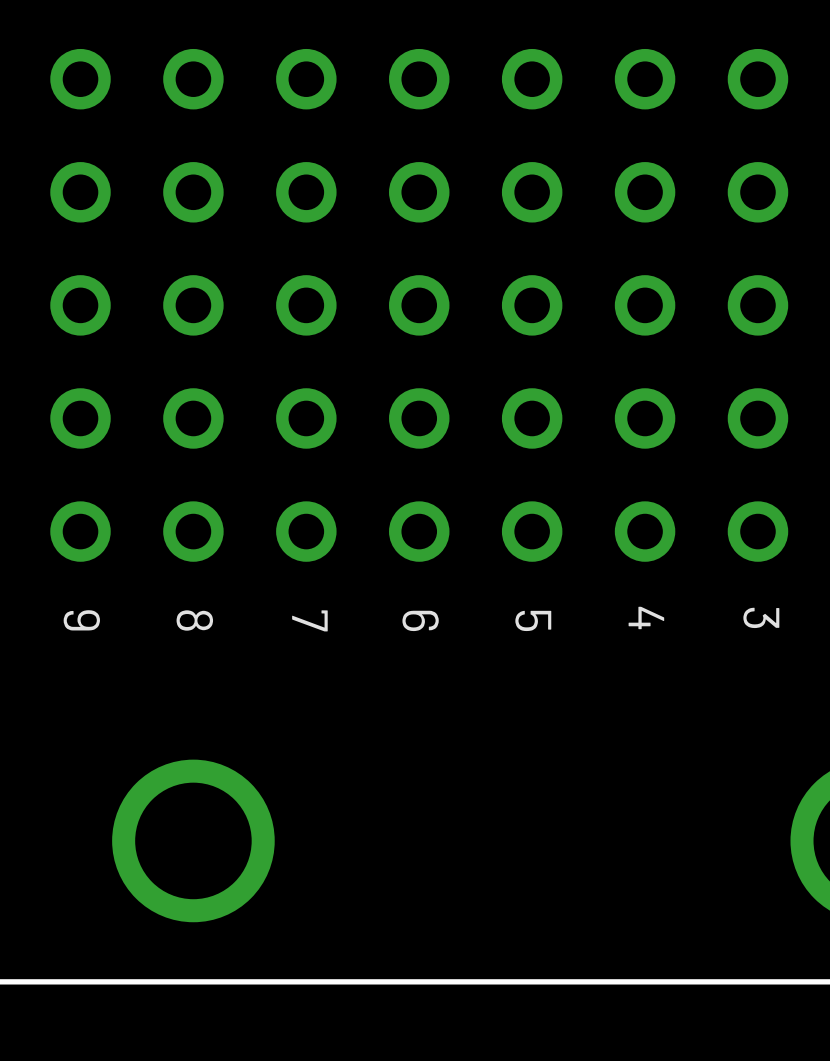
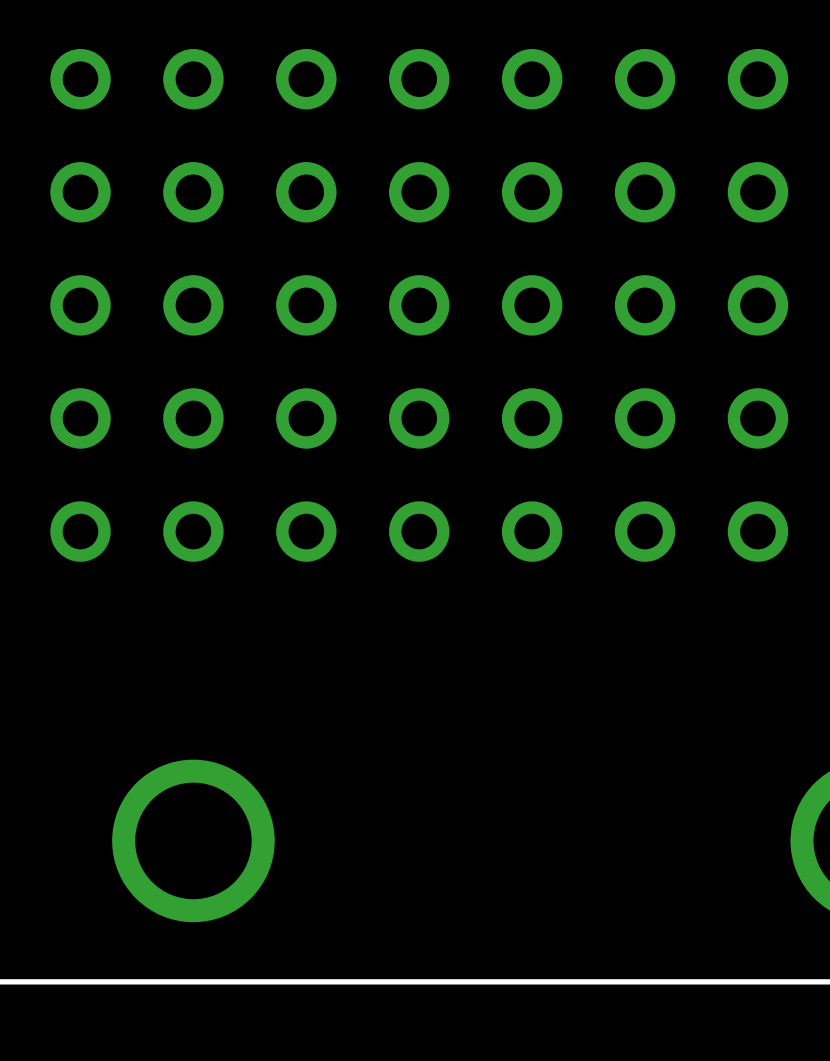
text: 4 (646, 617) -> none
text: 3 (761, 617) -> none
text: 9 (81, 620) -> none
text: 8 (194, 620) -> none
text: 7 (309, 620) -> none
text: 6 (420, 620) -> none
text: 5 (533, 620) -> none

